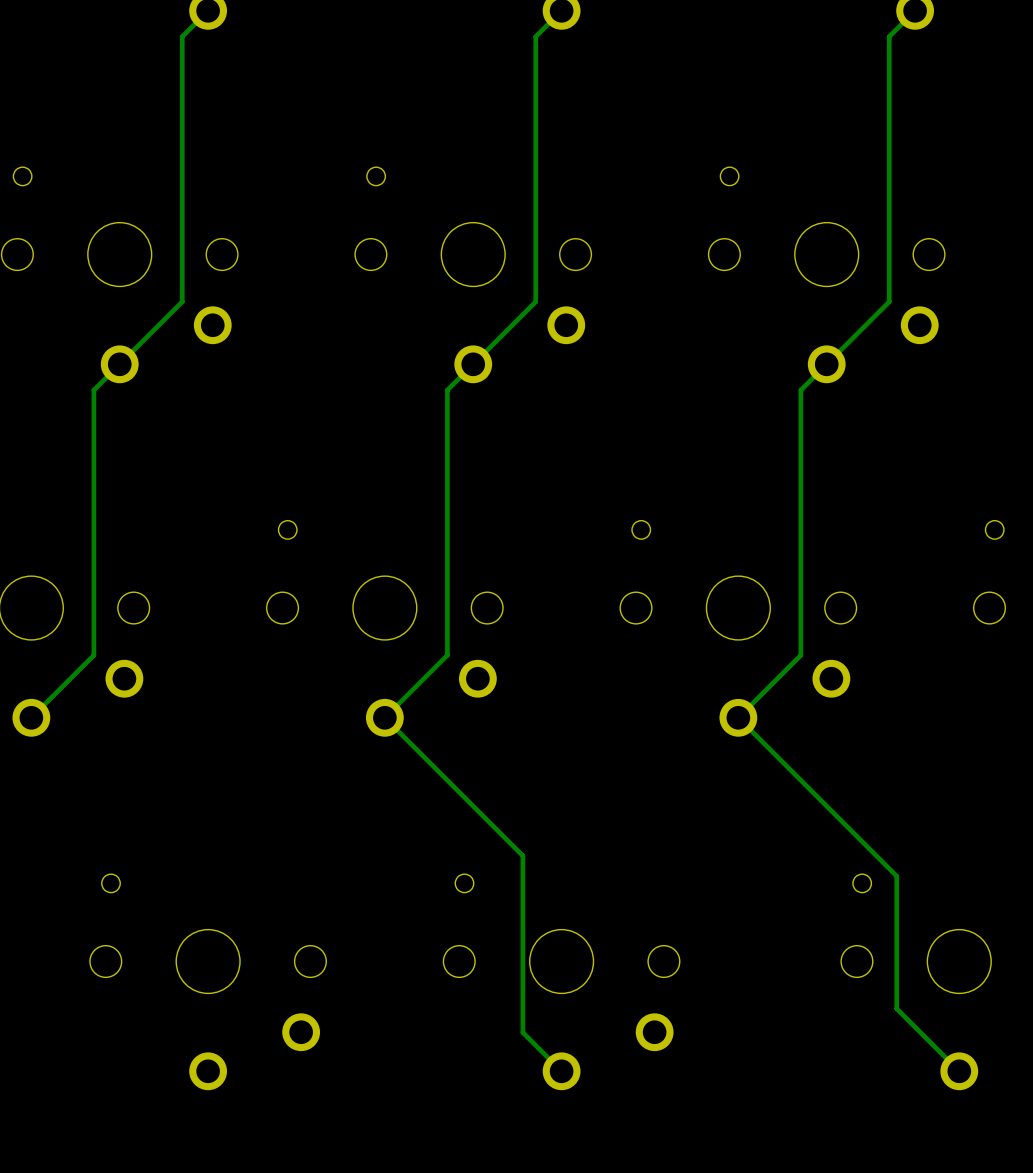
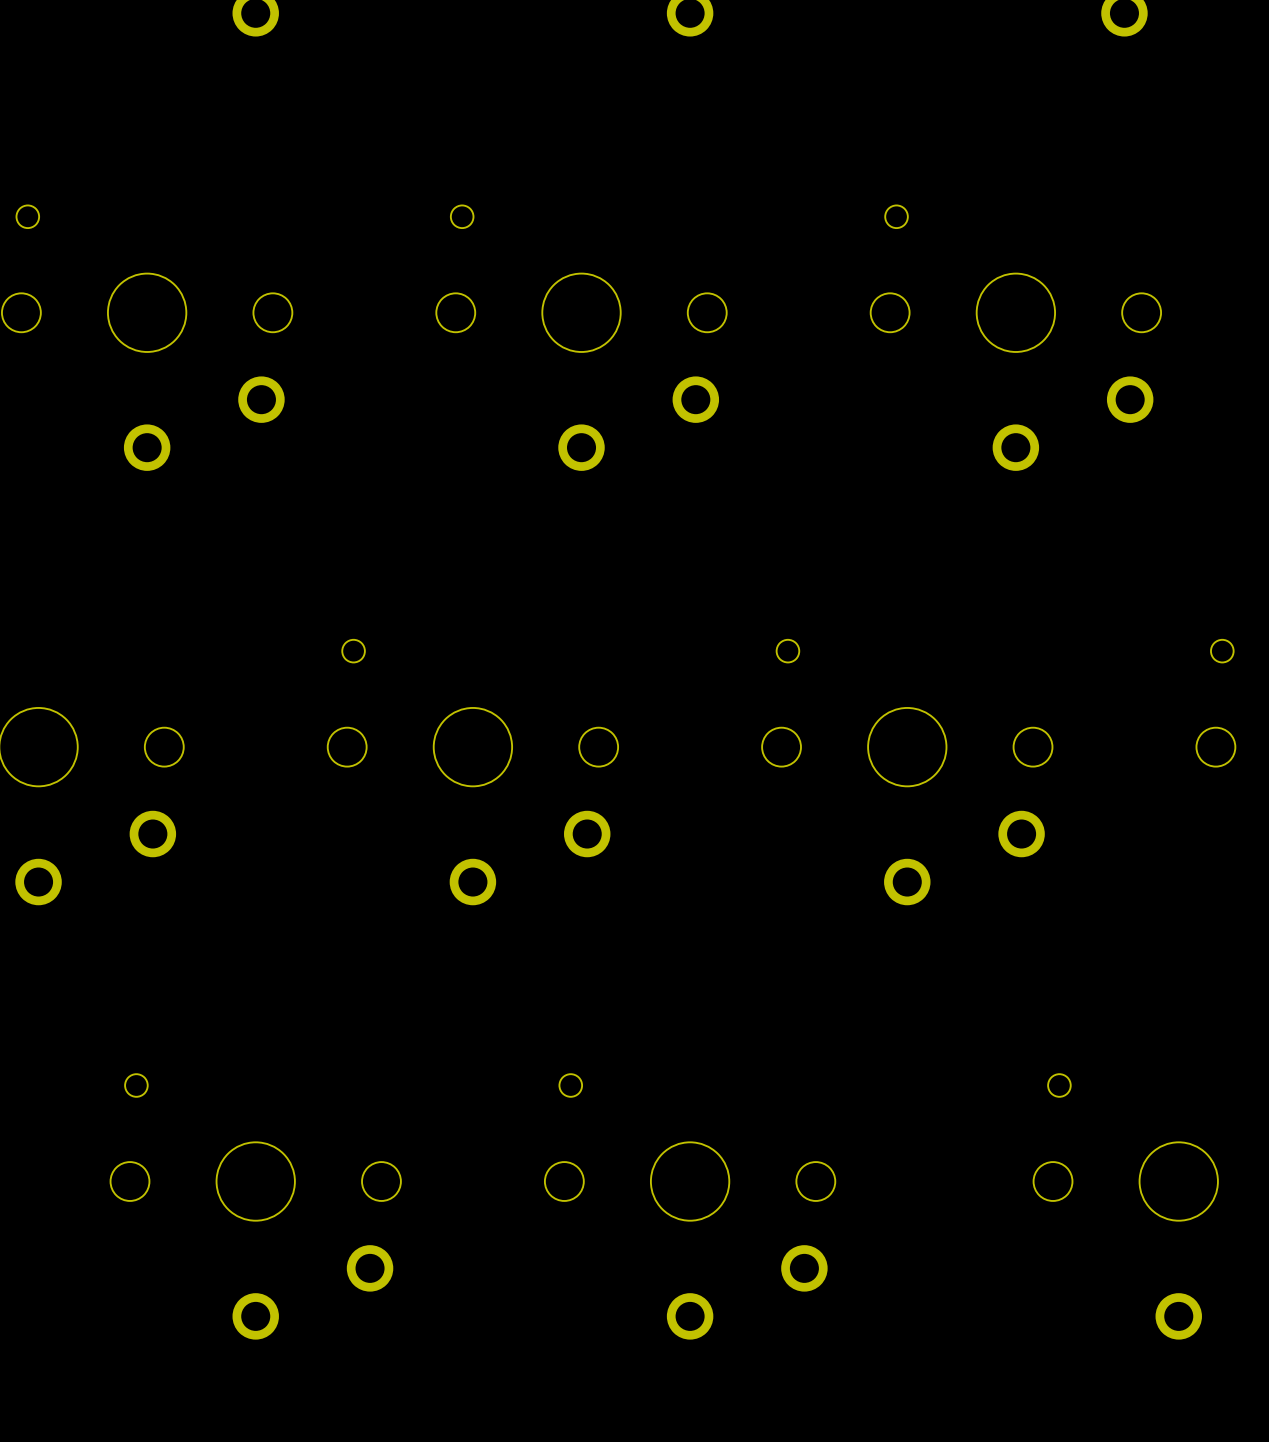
track: (208, 10) (182, 36) (182, 301) (93, 390) (93, 655) (31, 717) -> none
track: (561, 10) (535, 36) (535, 301) (447, 390) (447, 655) (384, 717) (522, 855) (522, 1032) (561, 1071) -> none
track: (915, 10) (889, 36) (889, 301) (800, 390) (800, 655) (738, 717) (896, 876) (896, 1008) (959, 1071) -> none

